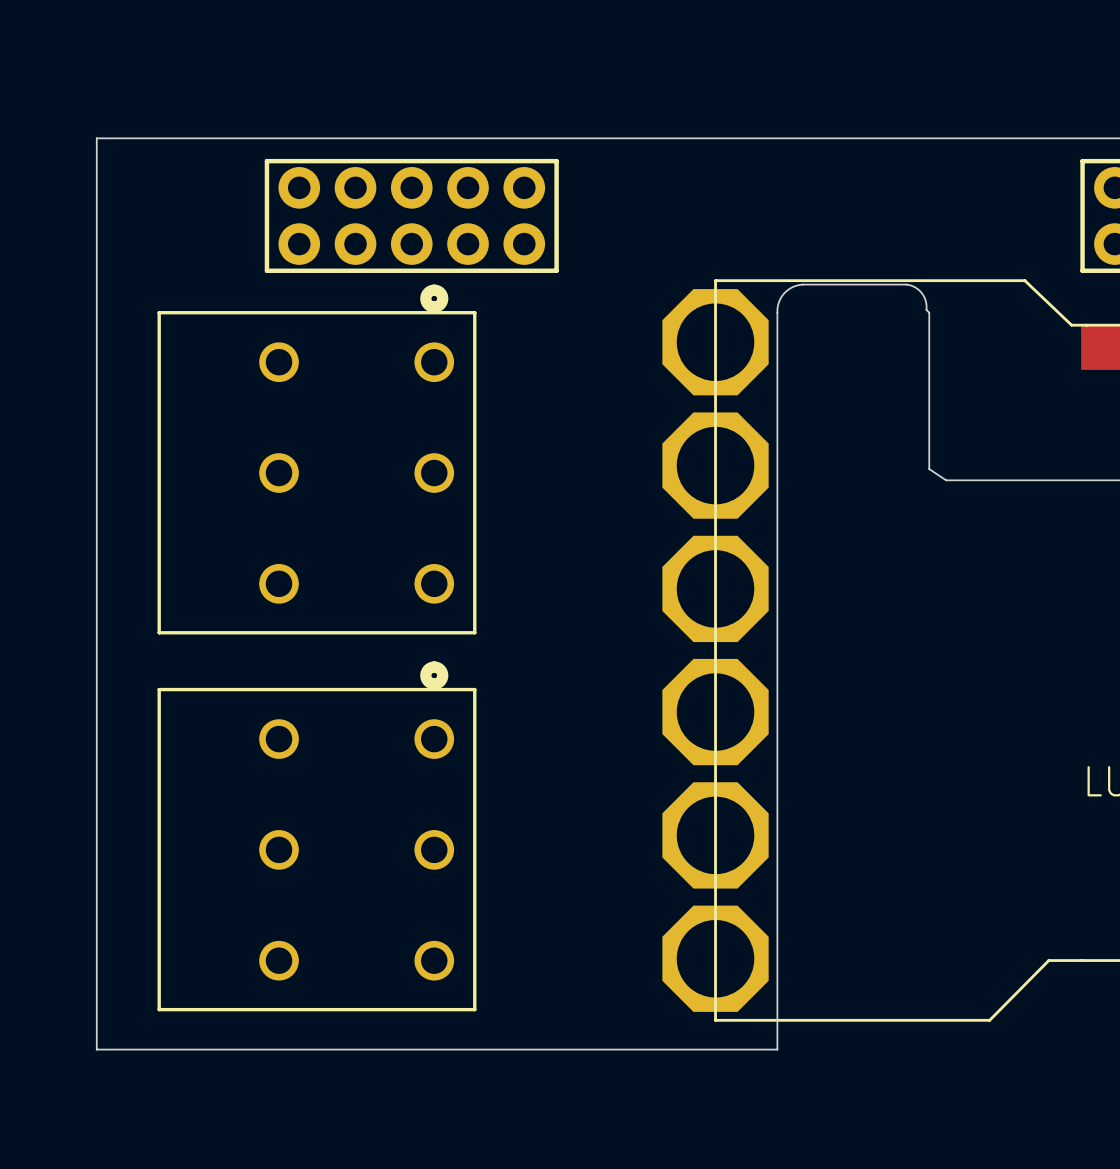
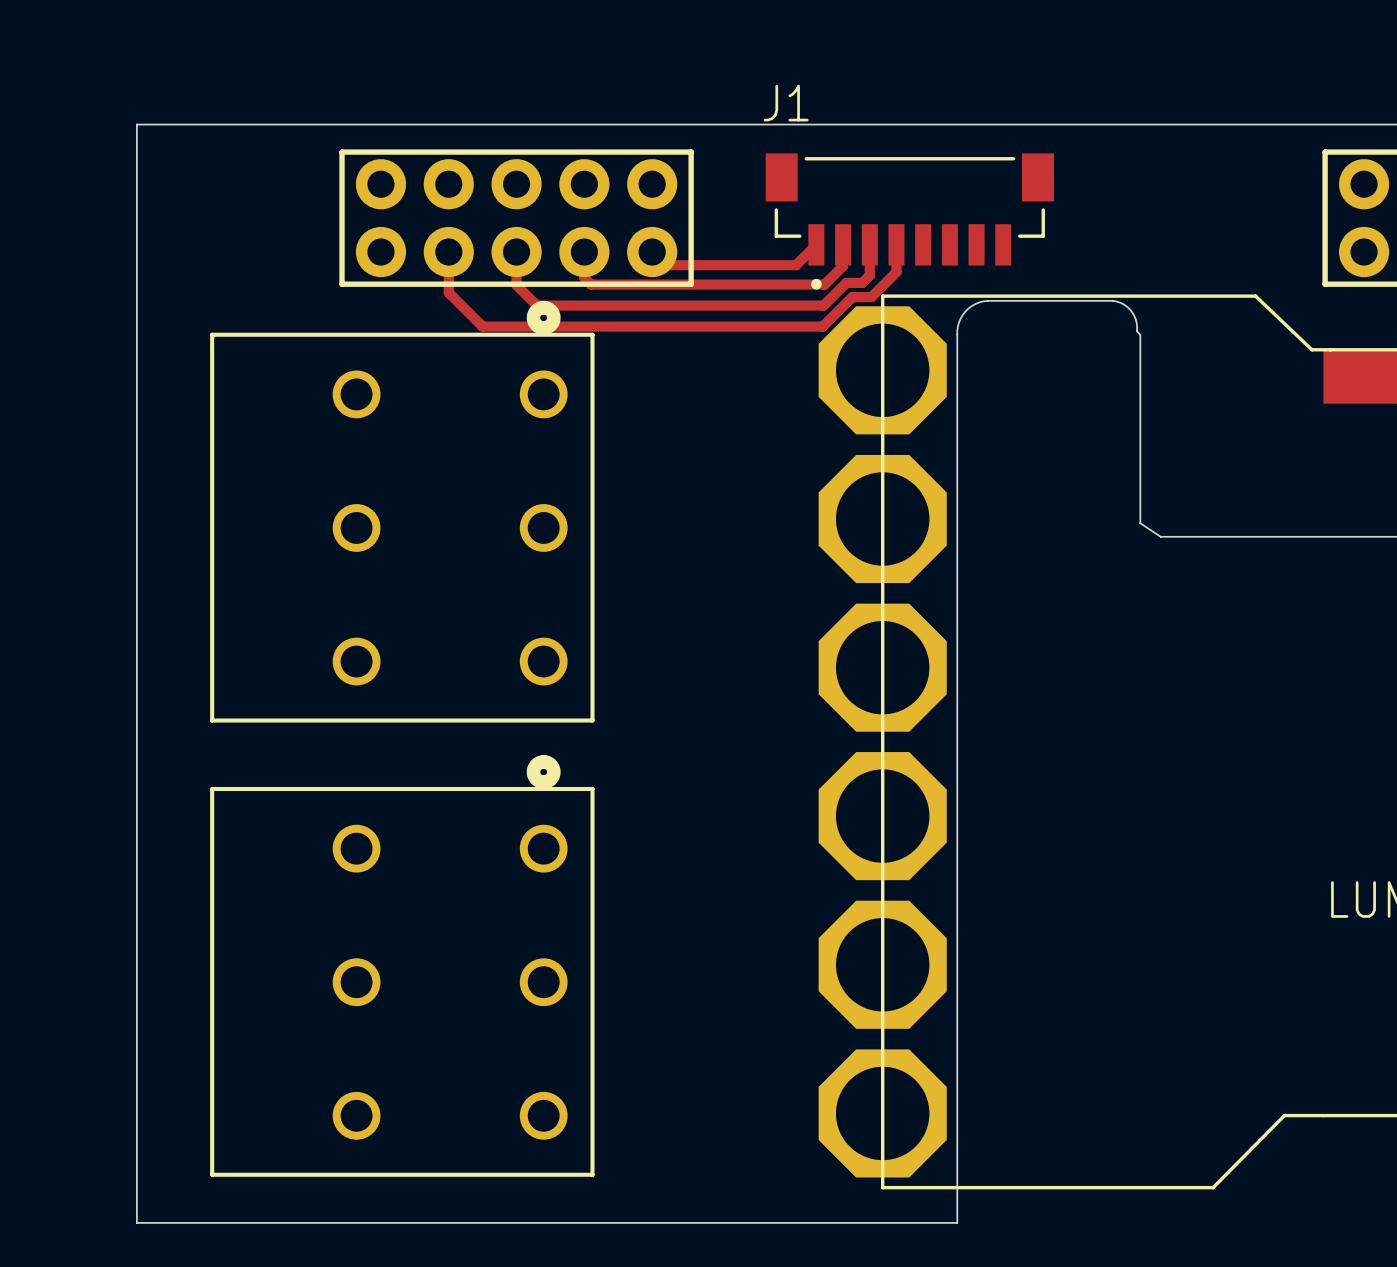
J1: none -> (909, 221)
track: none -> (815, 245) (796, 265) (665, 265) (652, 252)
track: none -> (843, 244) (843, 266) (824, 284) (591, 284) (584, 277) (584, 252)
track: none -> (869, 244) (869, 275) (862, 282) (846, 282) (823, 305) (536, 305) (516, 285) (516, 252)
track: none -> (896, 244) (896, 272) (871, 297) (852, 297) (822, 326) (482, 326) (448, 292) (448, 252)

